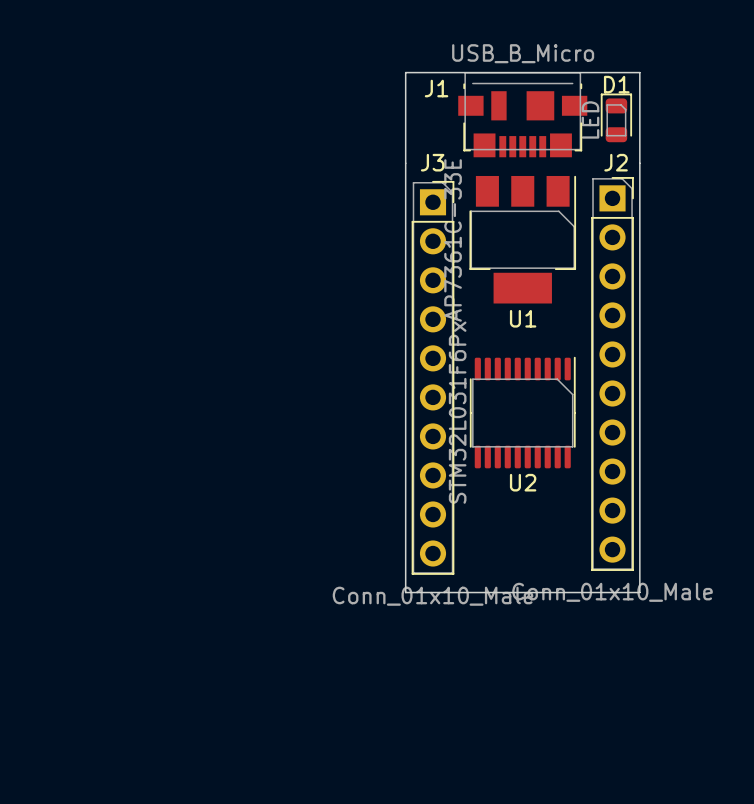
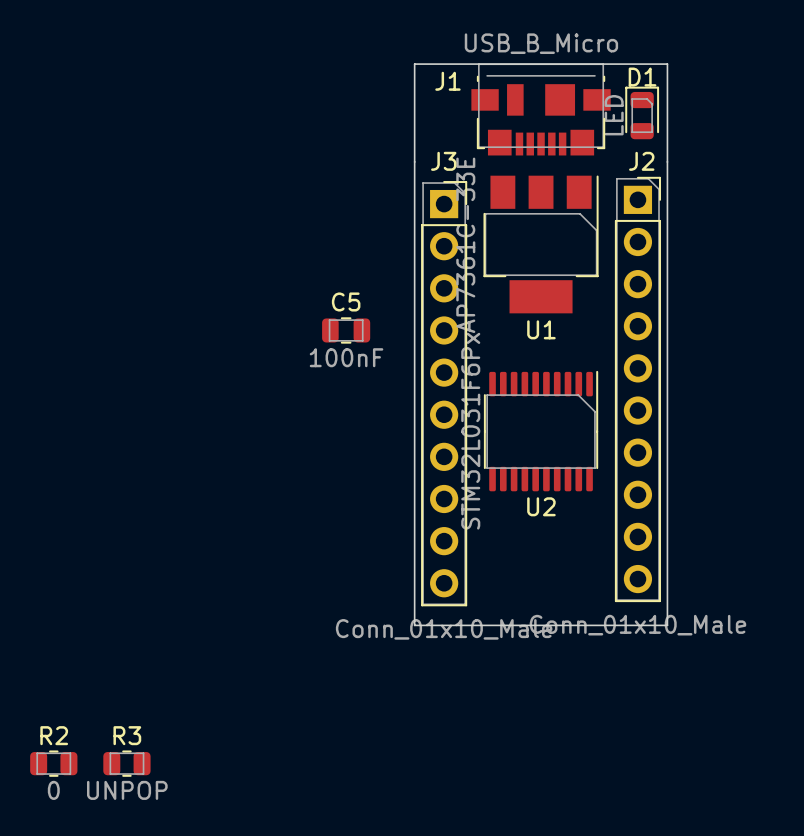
C5: none -> 100nF (346, 330)
R2: none -> 0 (53, 763)
R3: none -> UNPOP (126, 763)

